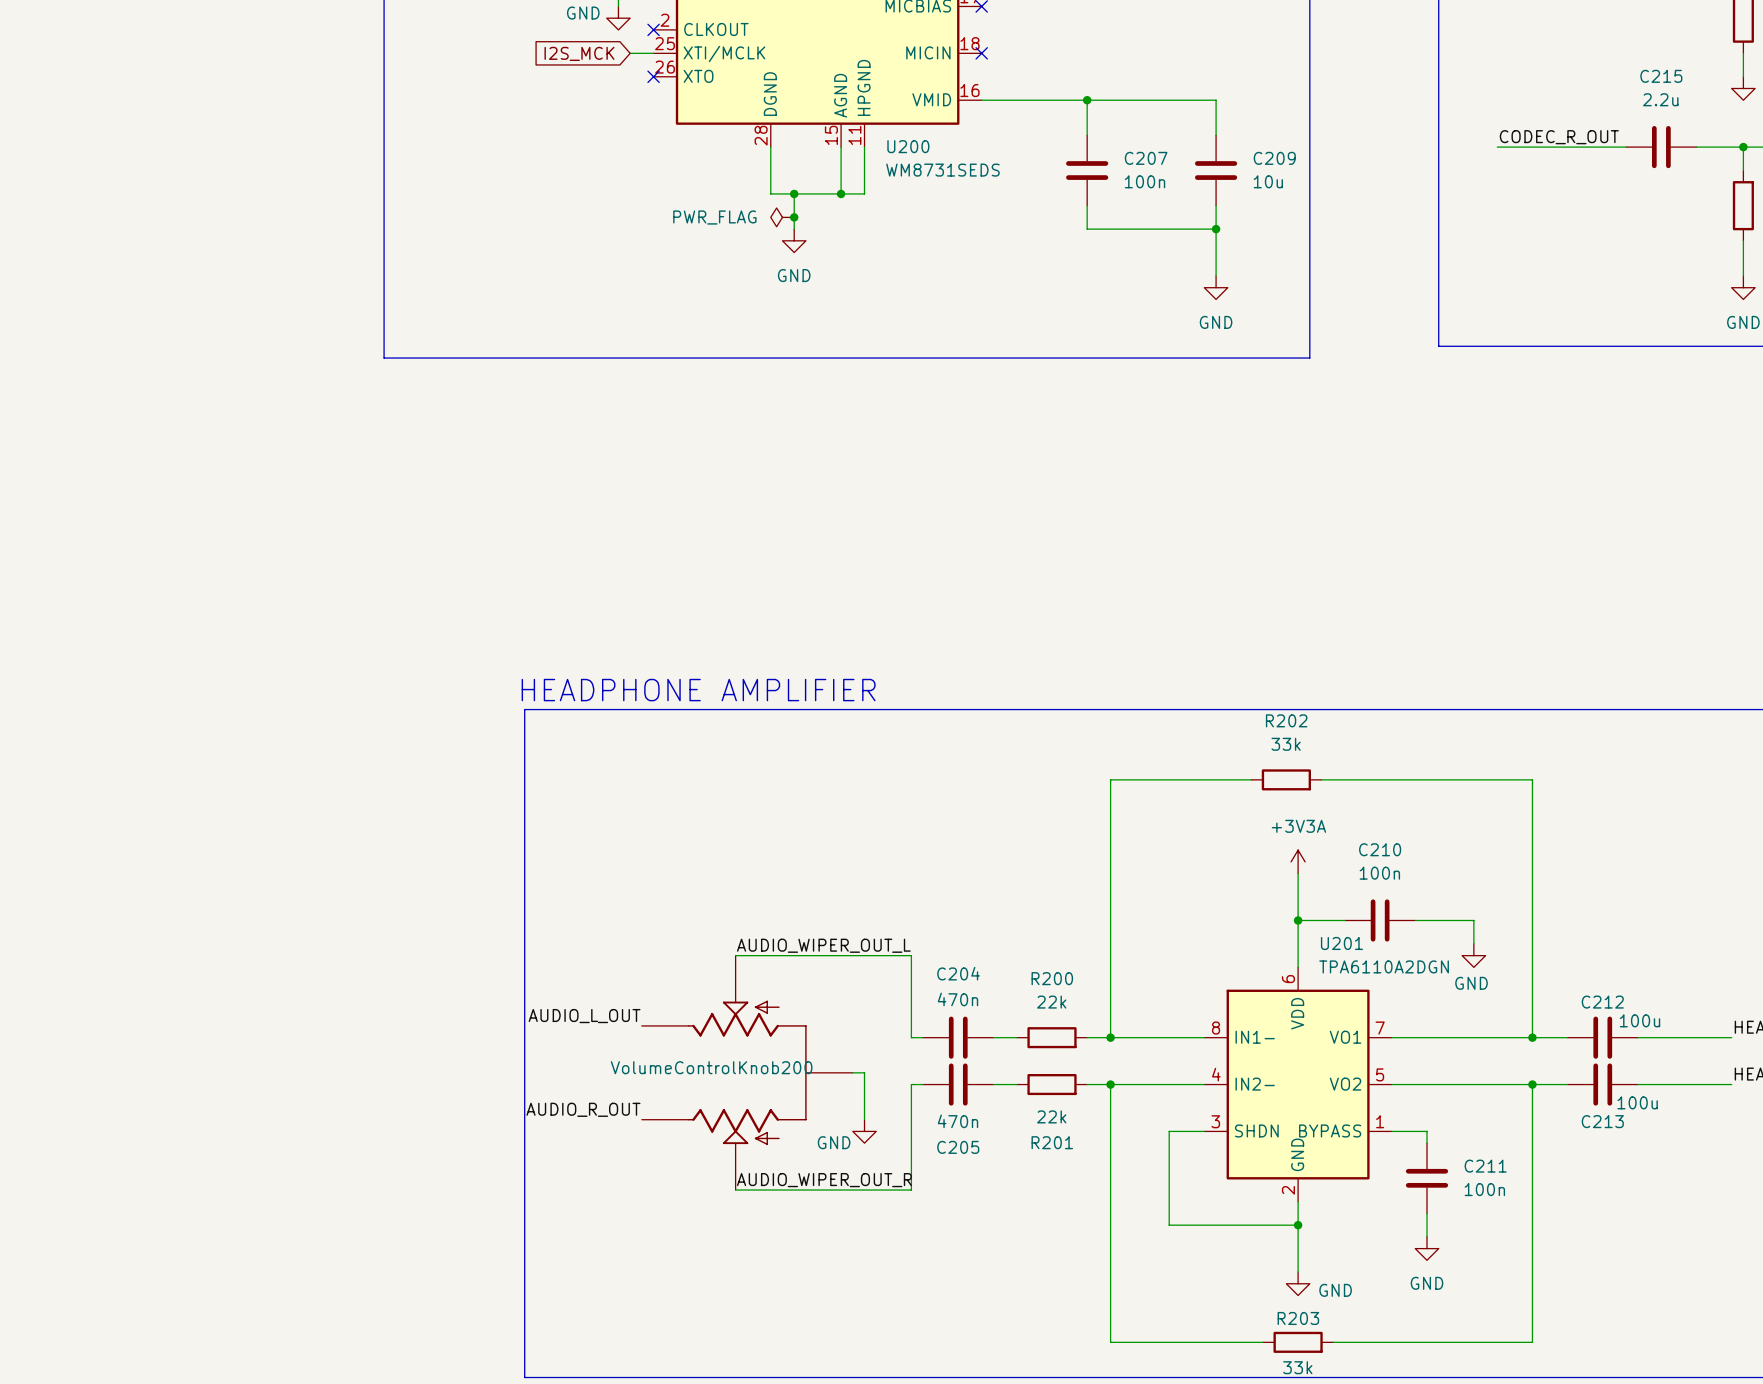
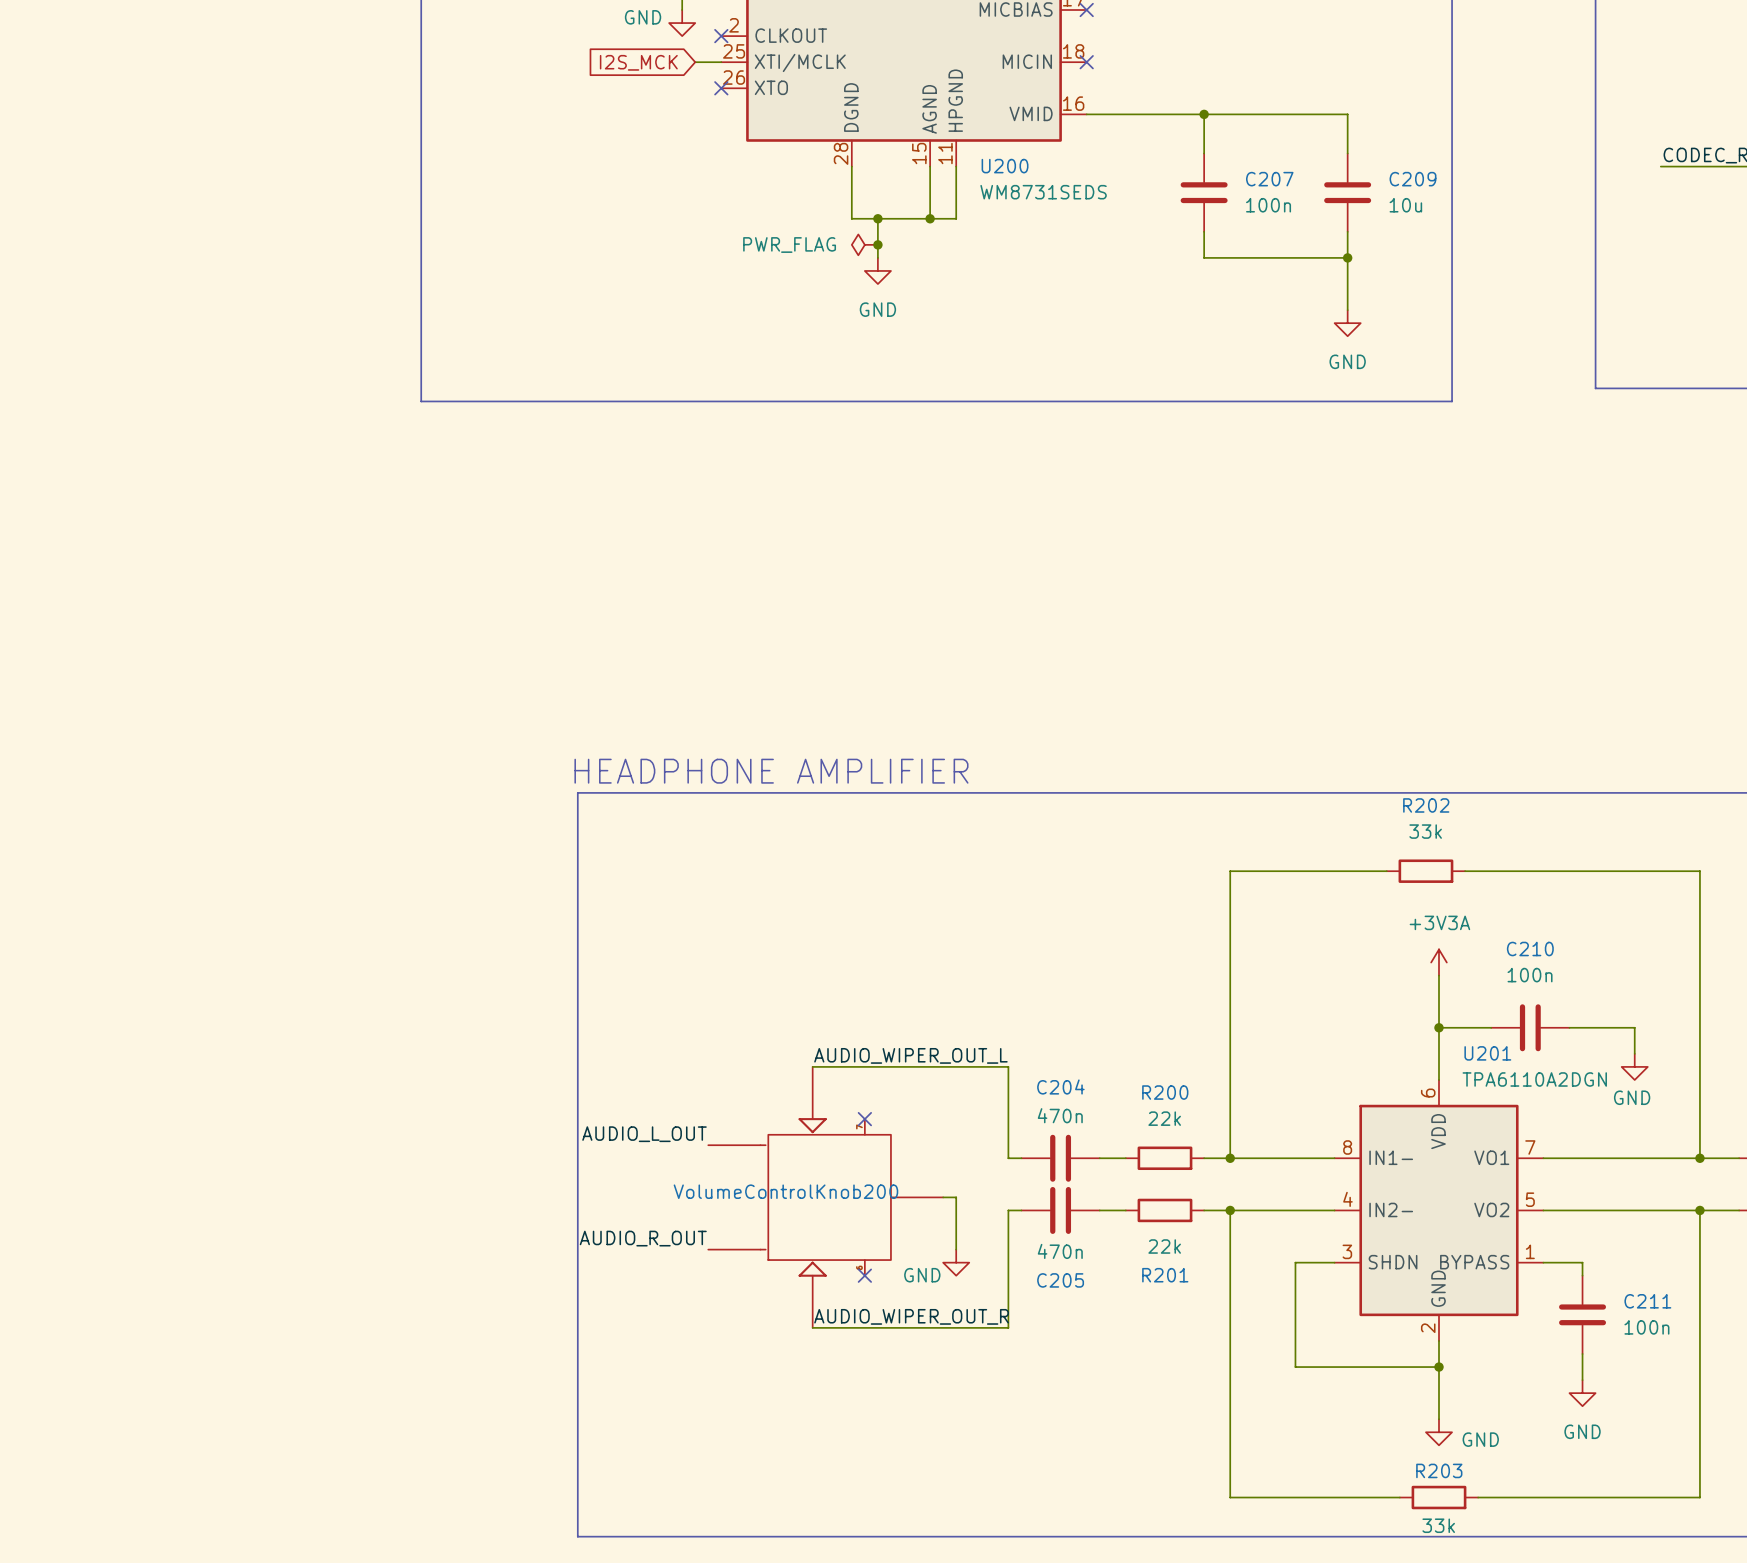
VolumeControlKnob200 symbol: [641, 955, 853, 1191] -> [708, 1066, 944, 1328]
no-connect mark: none -> (864, 1119)
no-connect mark: none -> (864, 1275)

